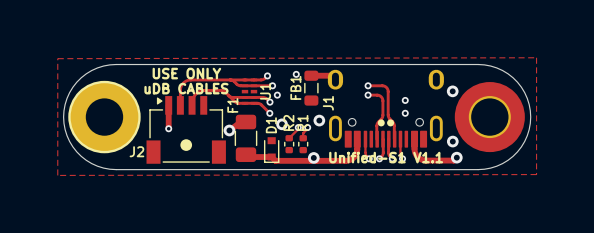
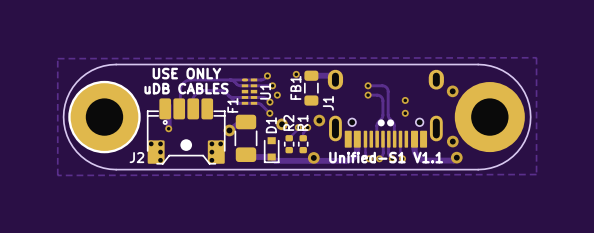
J2 footprint: [146, 96, 226, 164] -> [146, 98, 226, 165]

